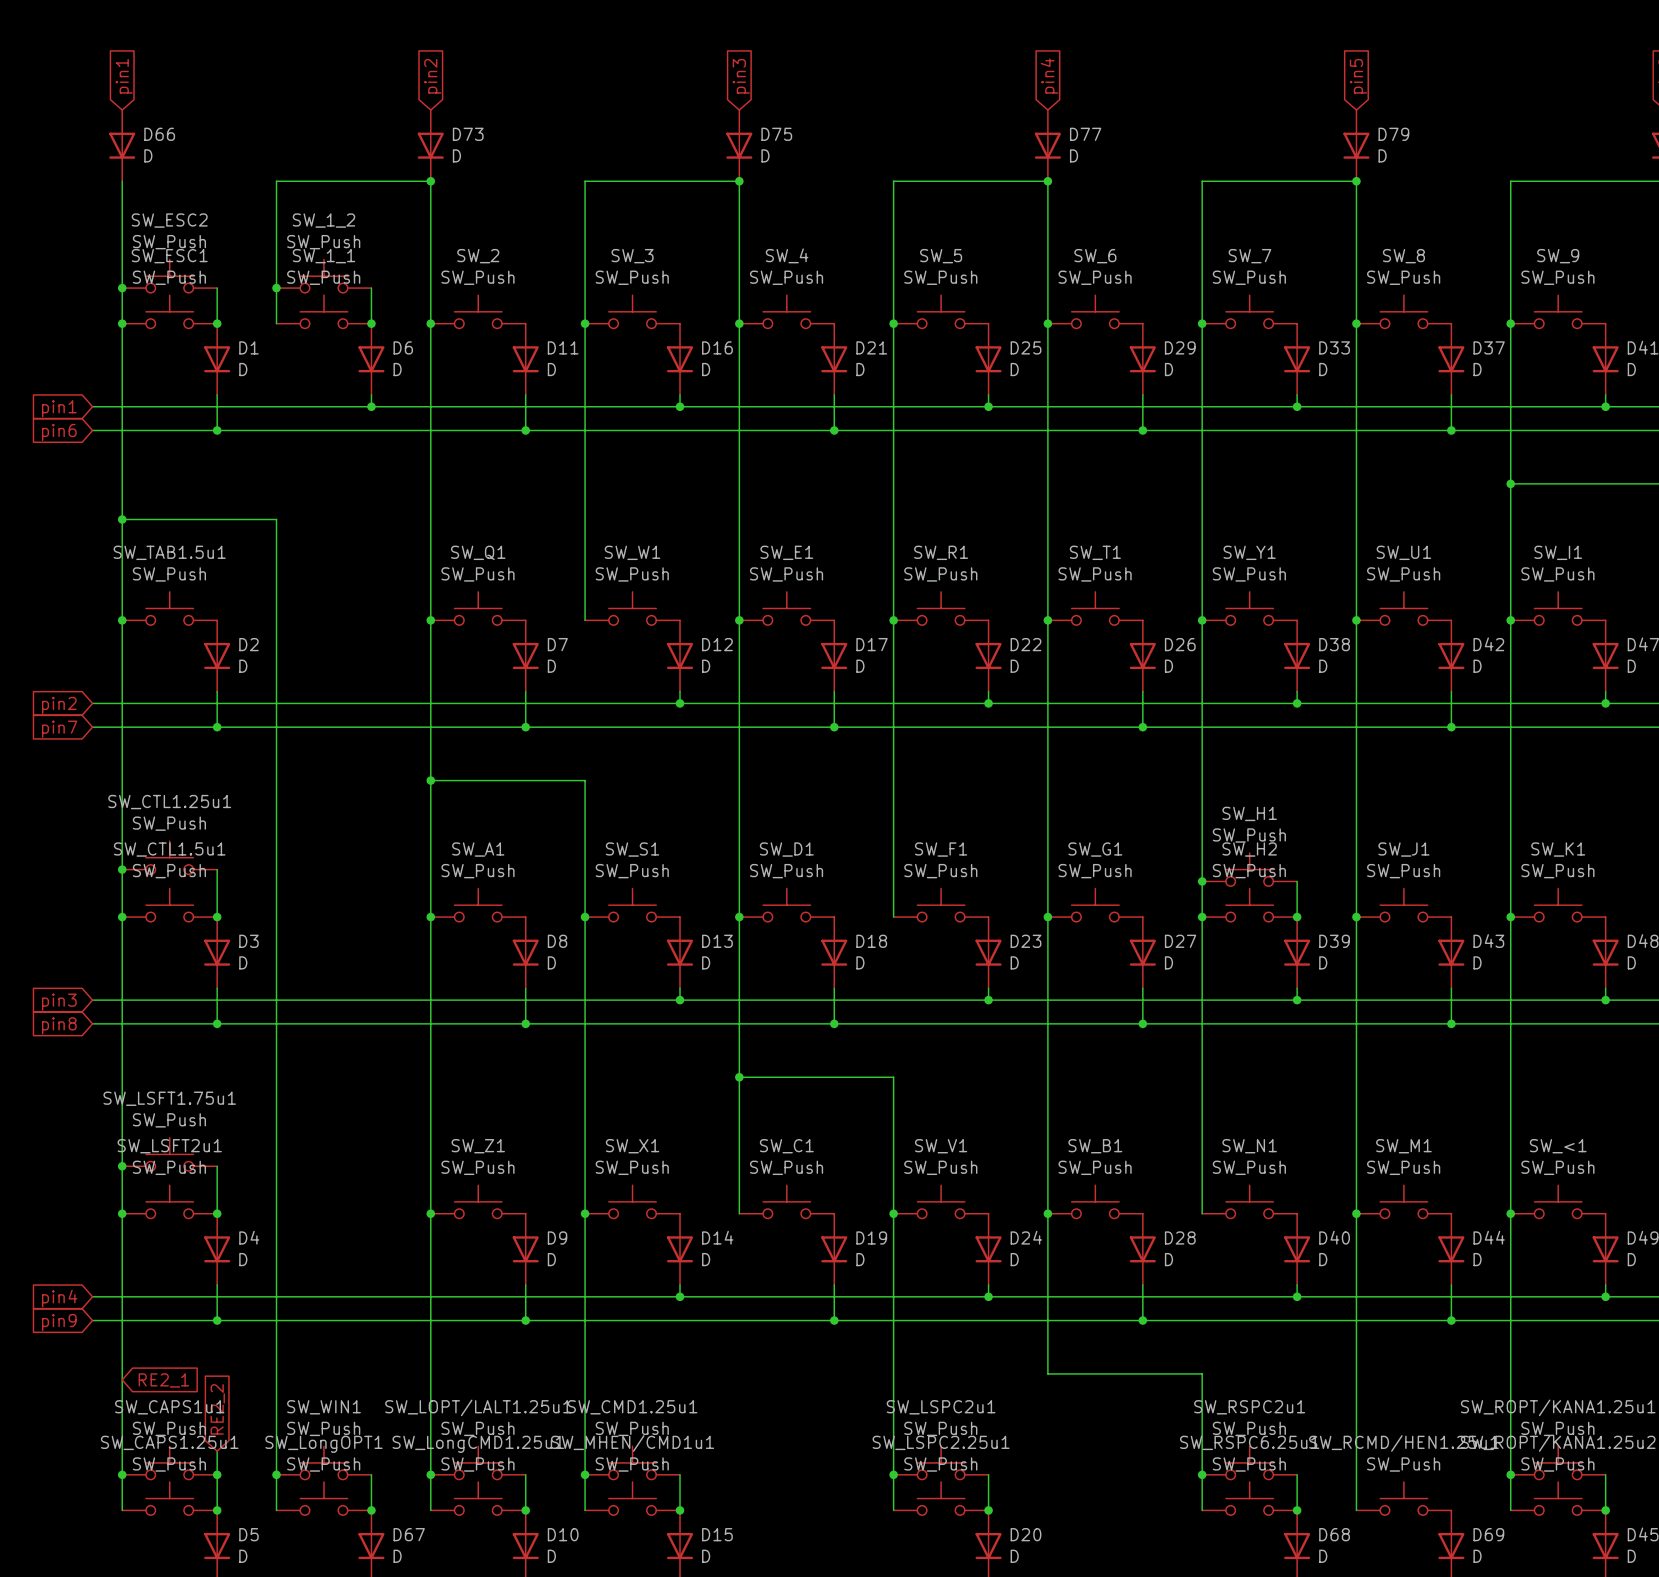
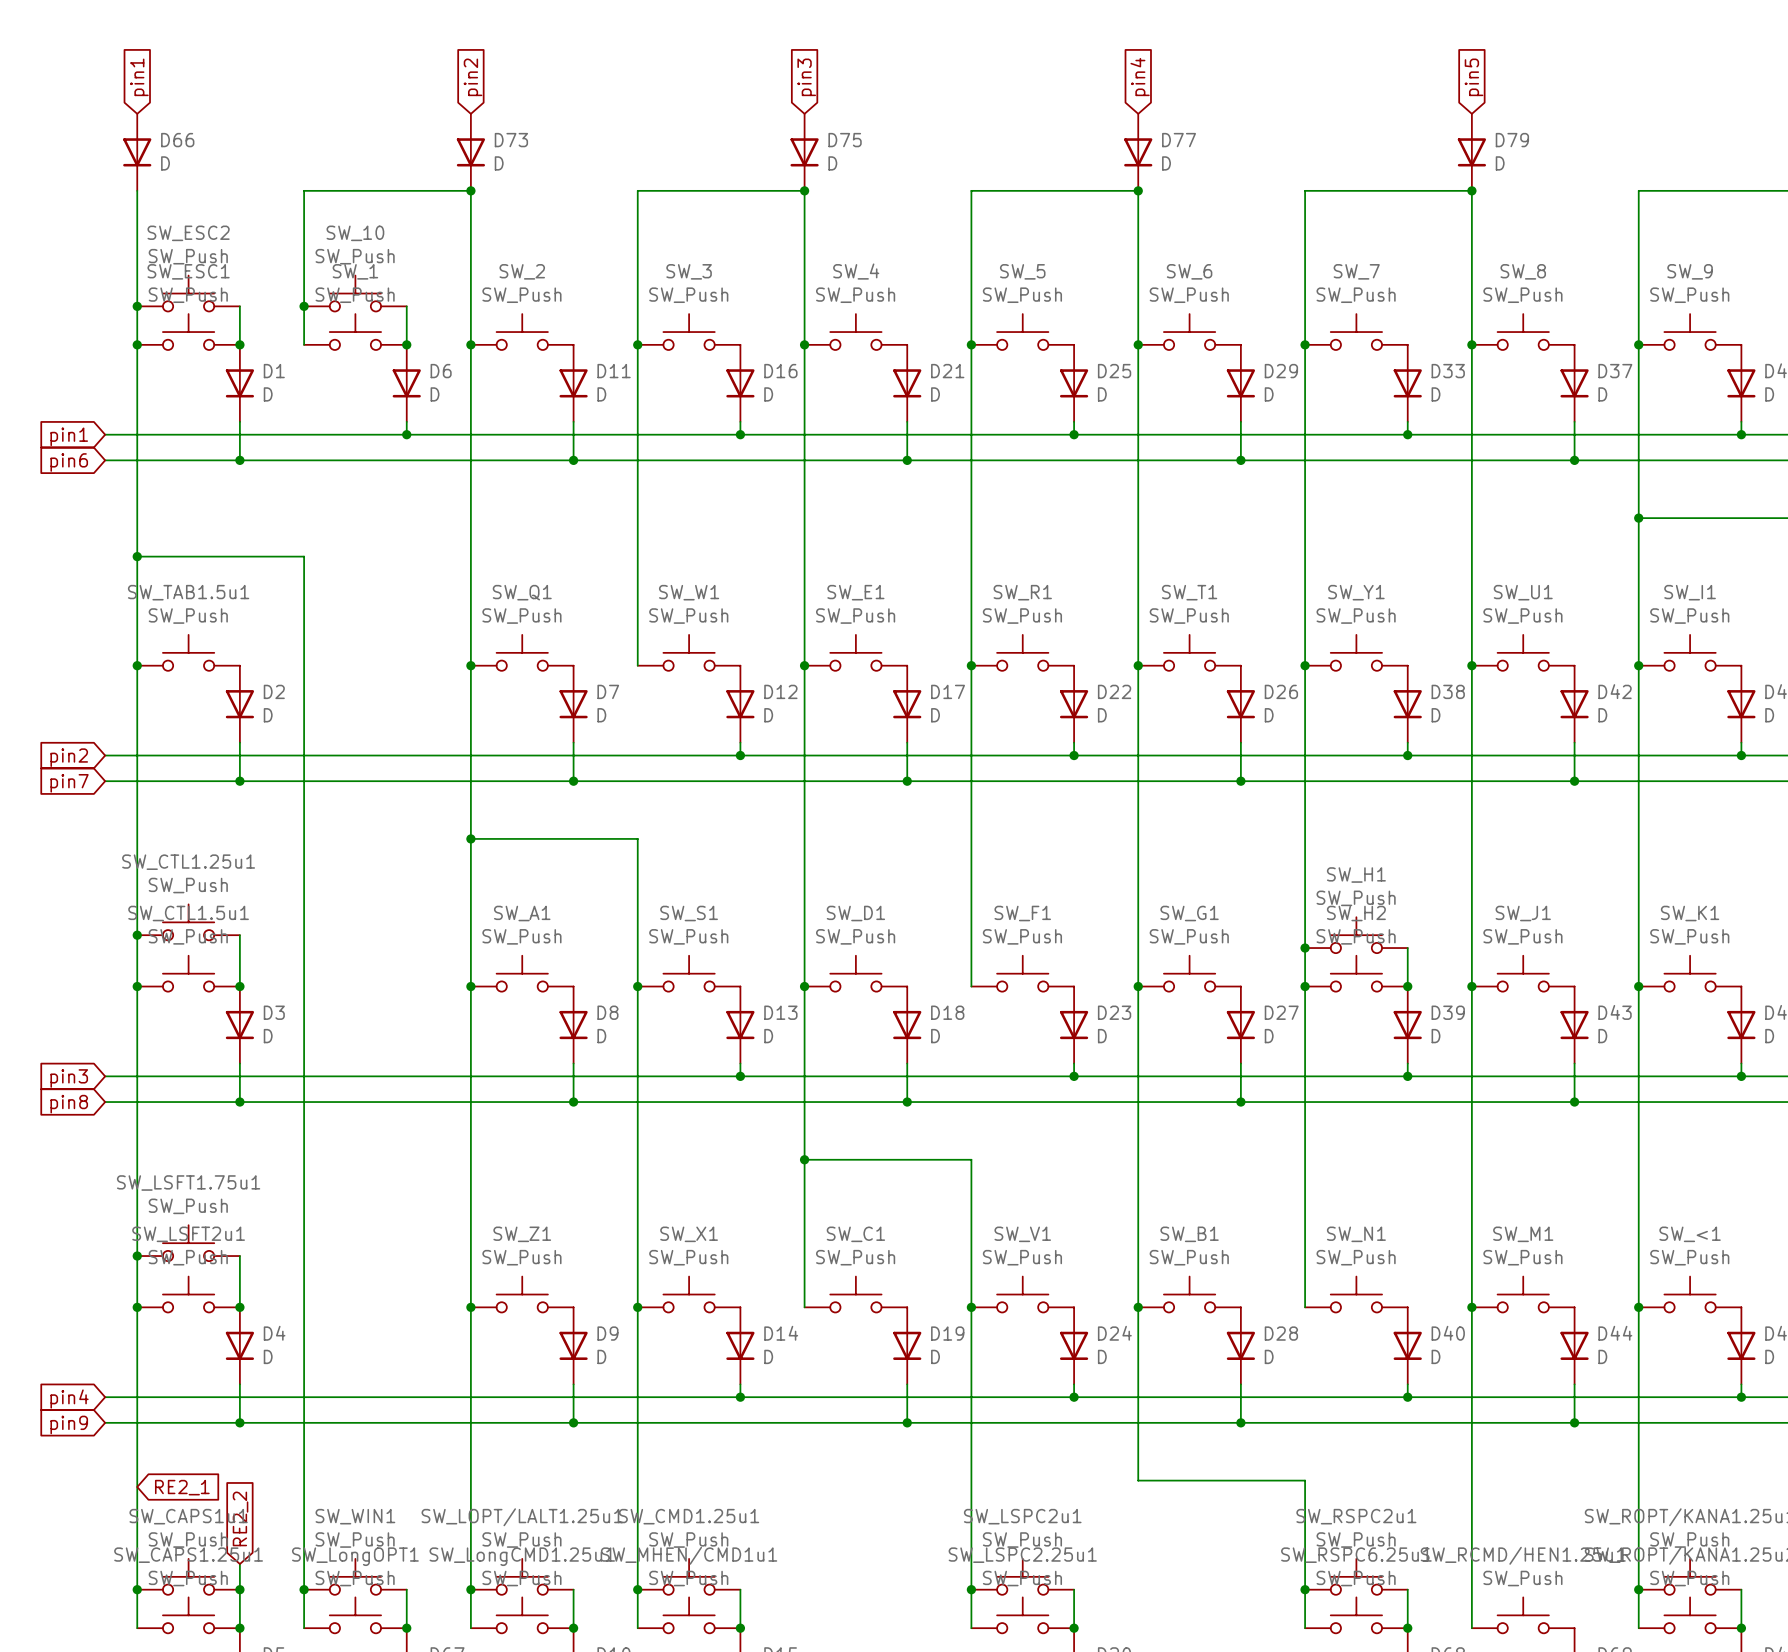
SW_1_2 name: SW_1_2 (323, 220) -> SW_10 (355, 233)
SW_1_1 name: SW_1_1 (323, 256) -> SW_1 (355, 271)

